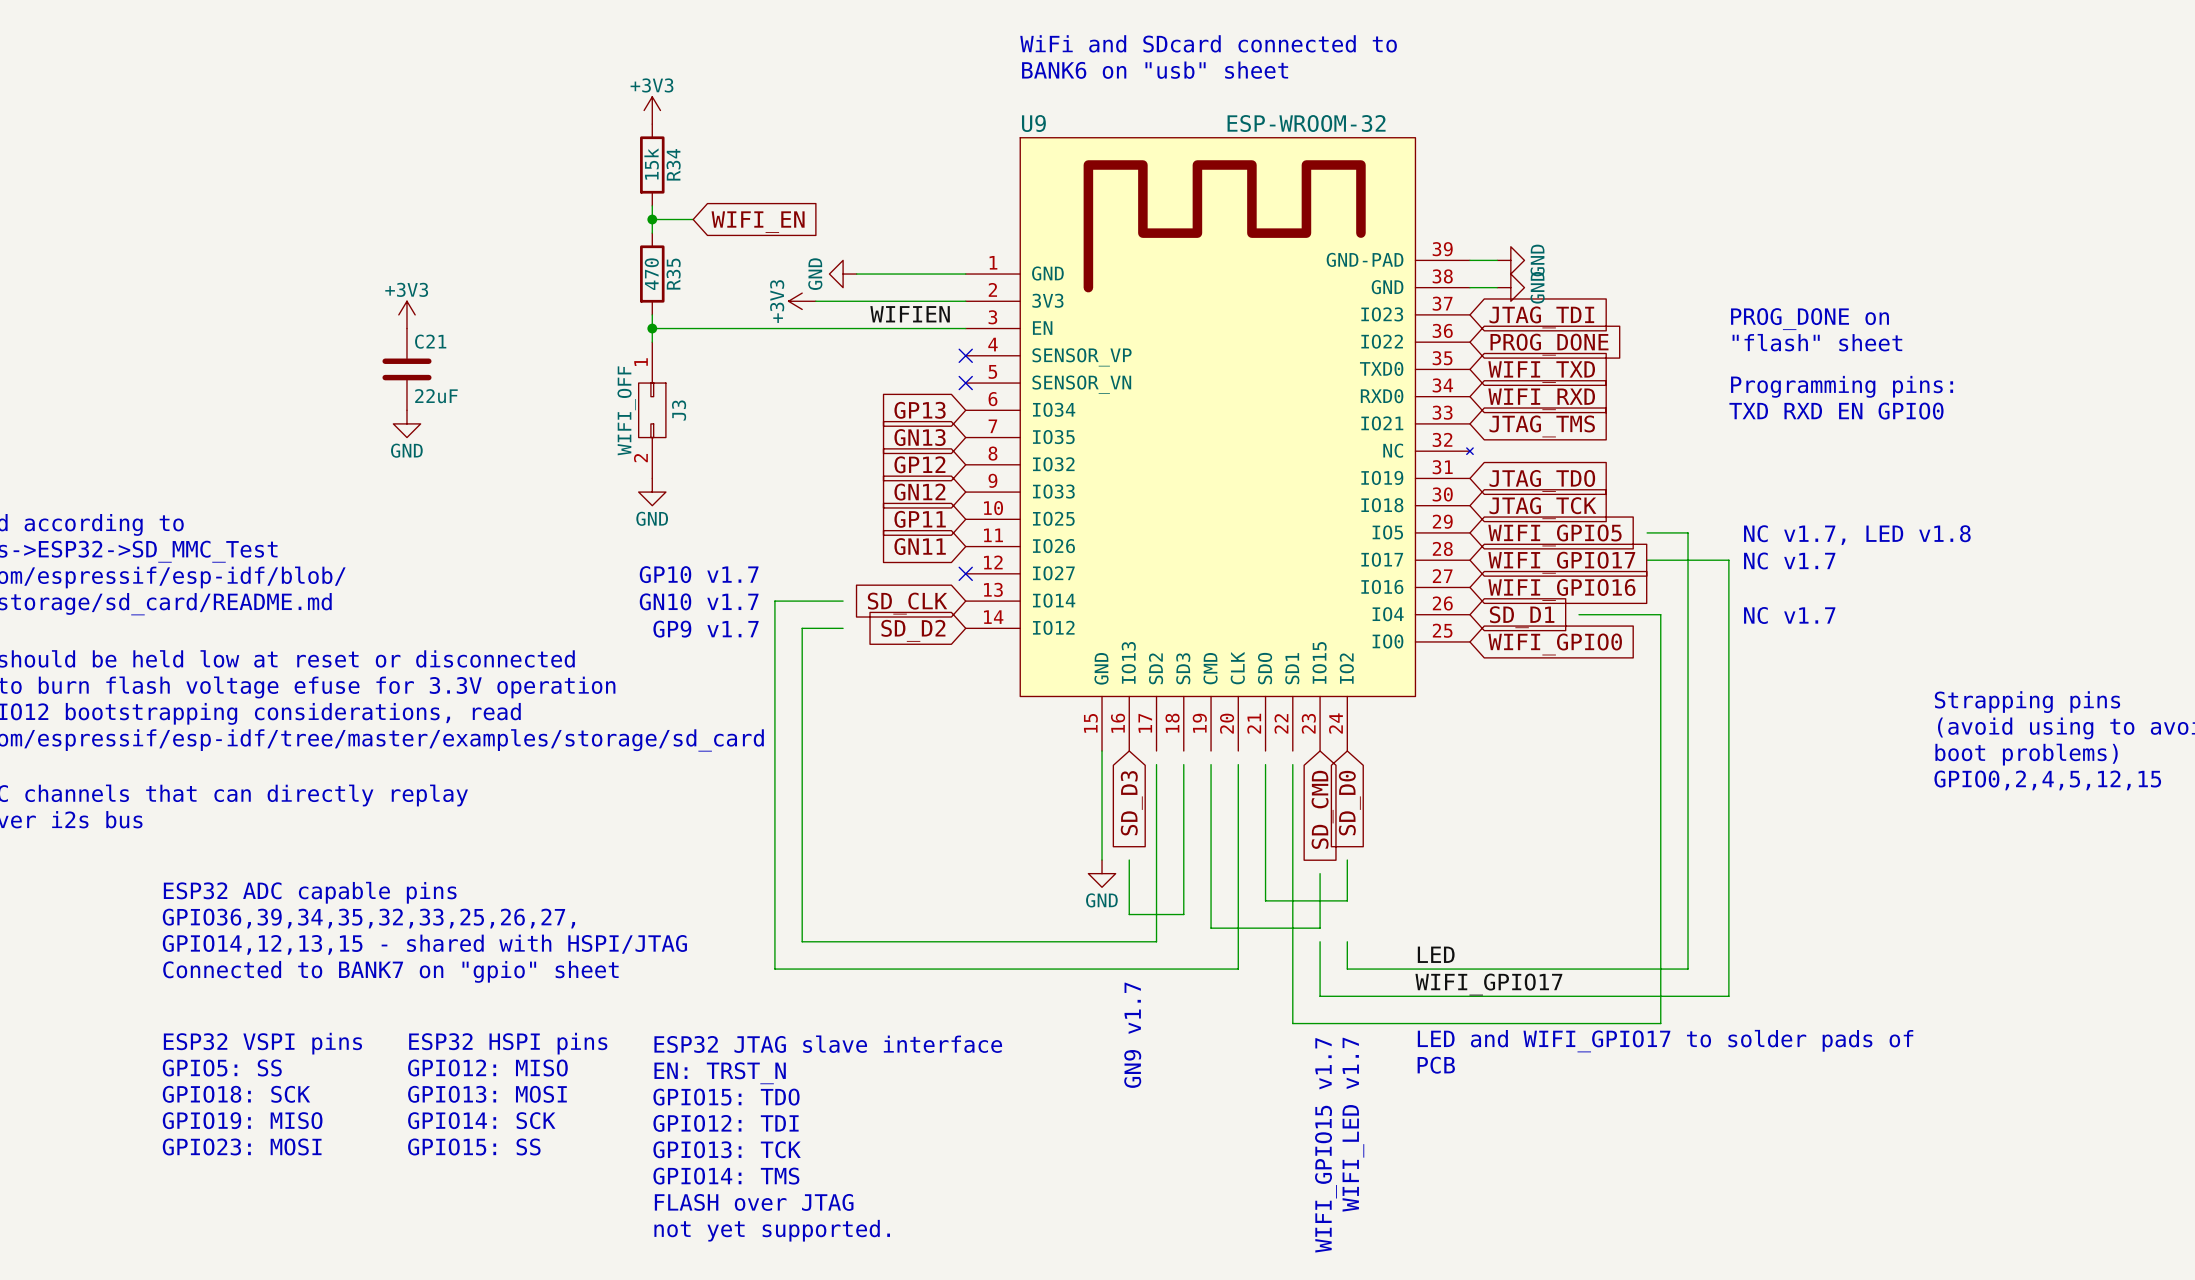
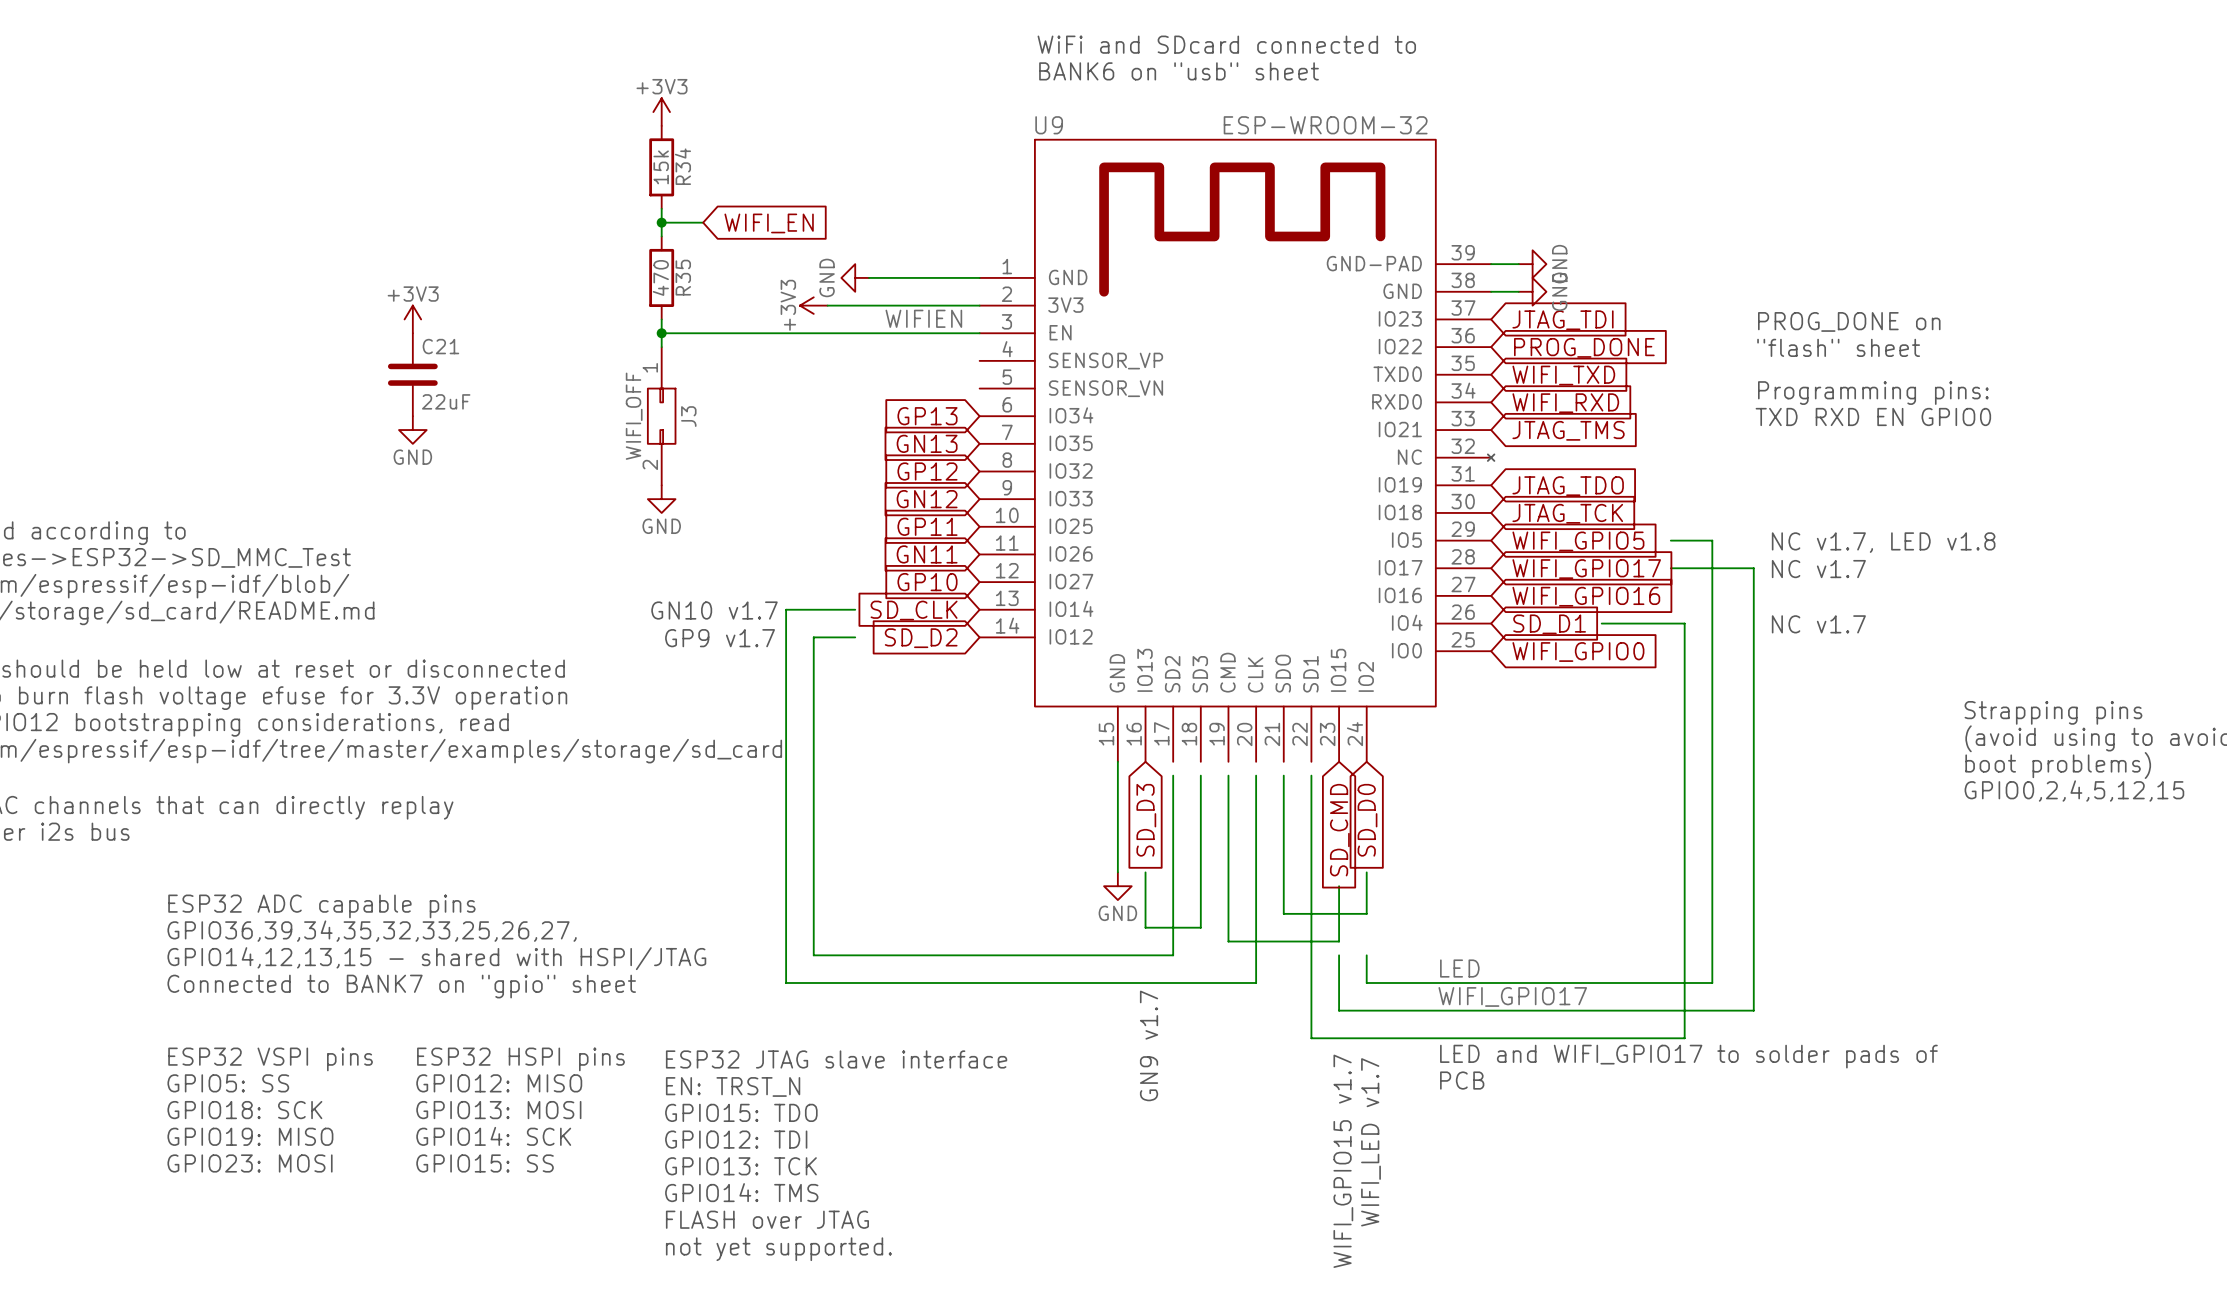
no-connect mark: (965, 355) -> none
no-connect mark: (965, 383) -> none
global label: none -> GP10 (927, 582)
no-connect mark: (965, 573) -> none
text: GP10 v1.7 (699, 574) -> none

